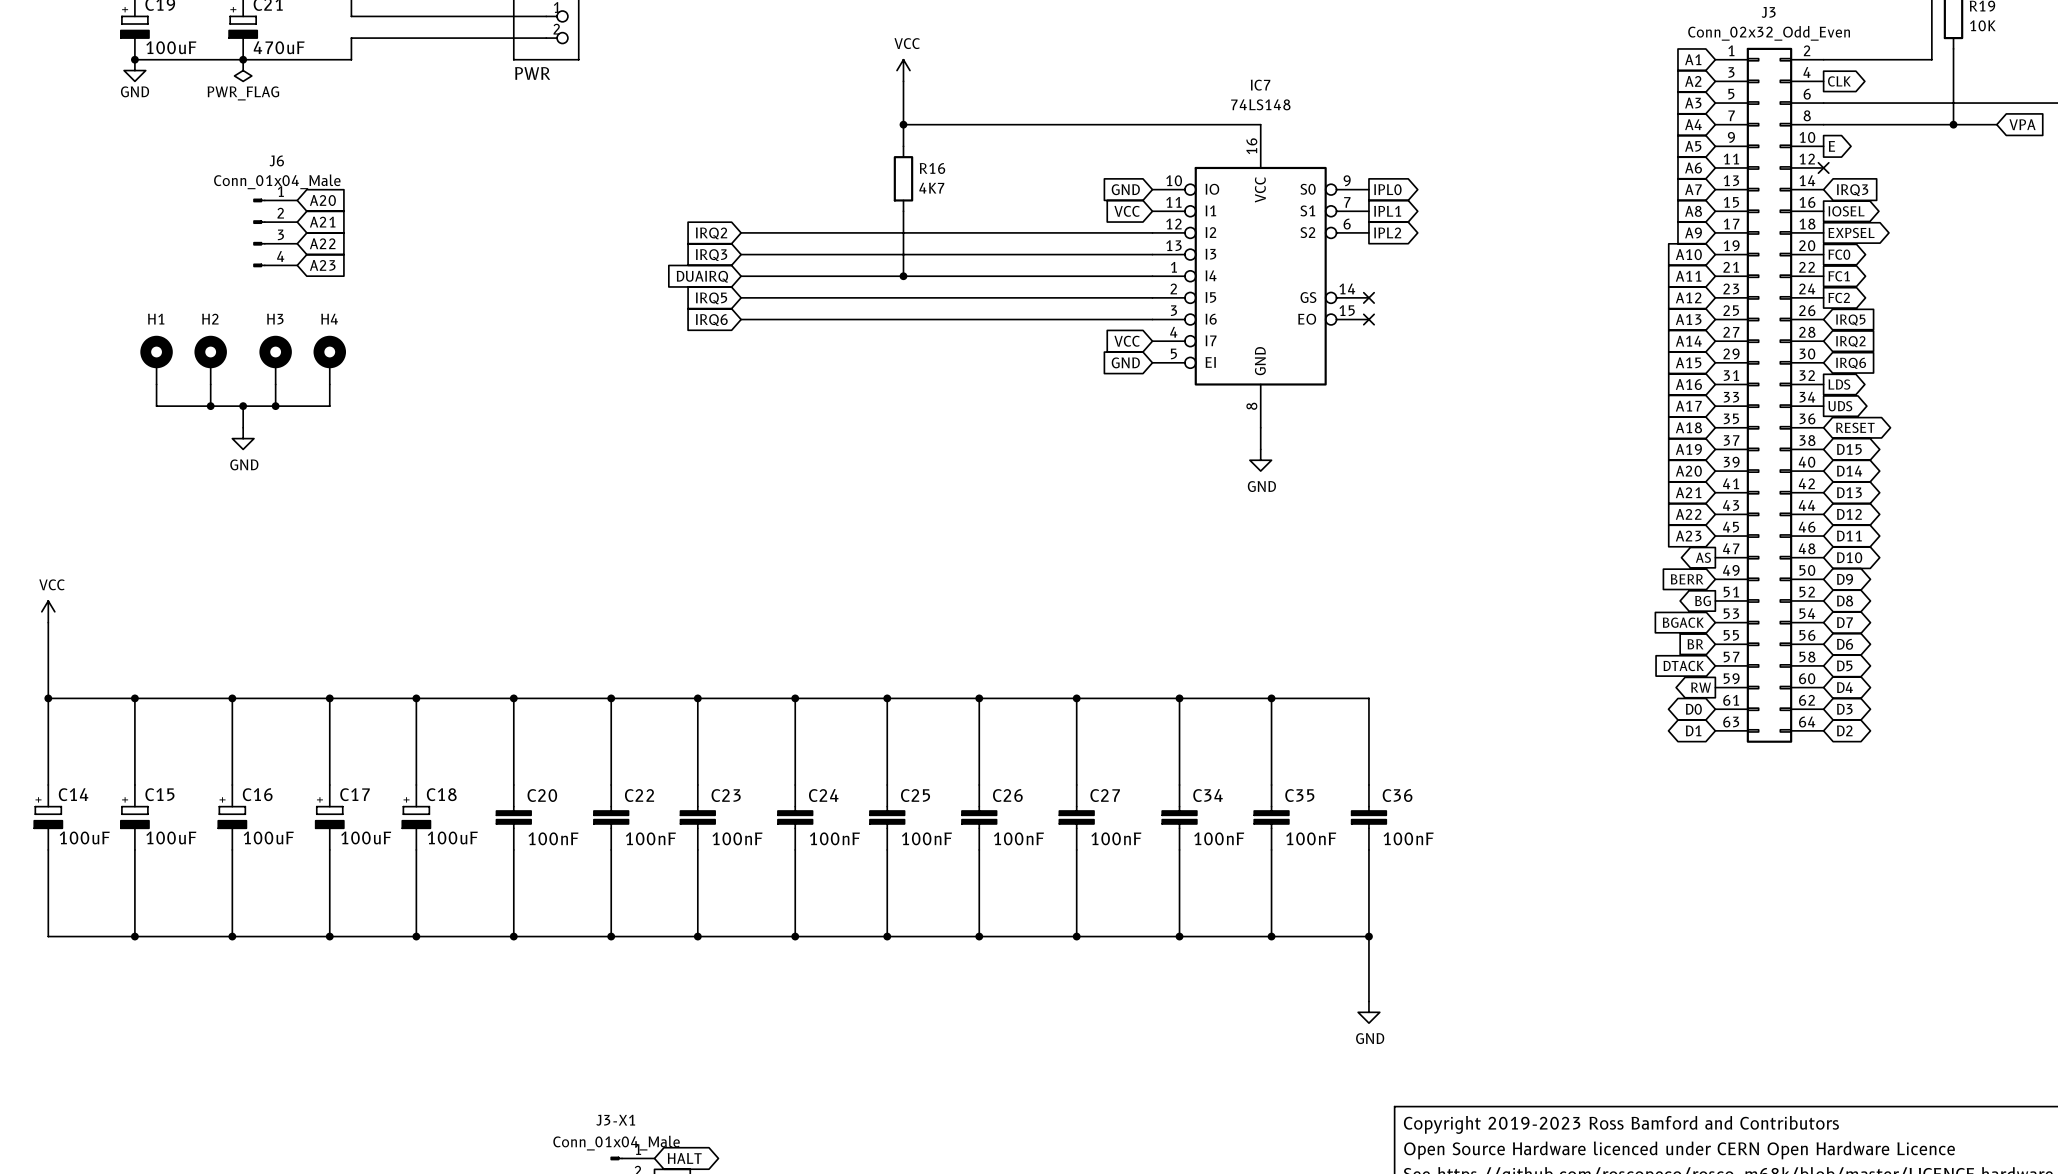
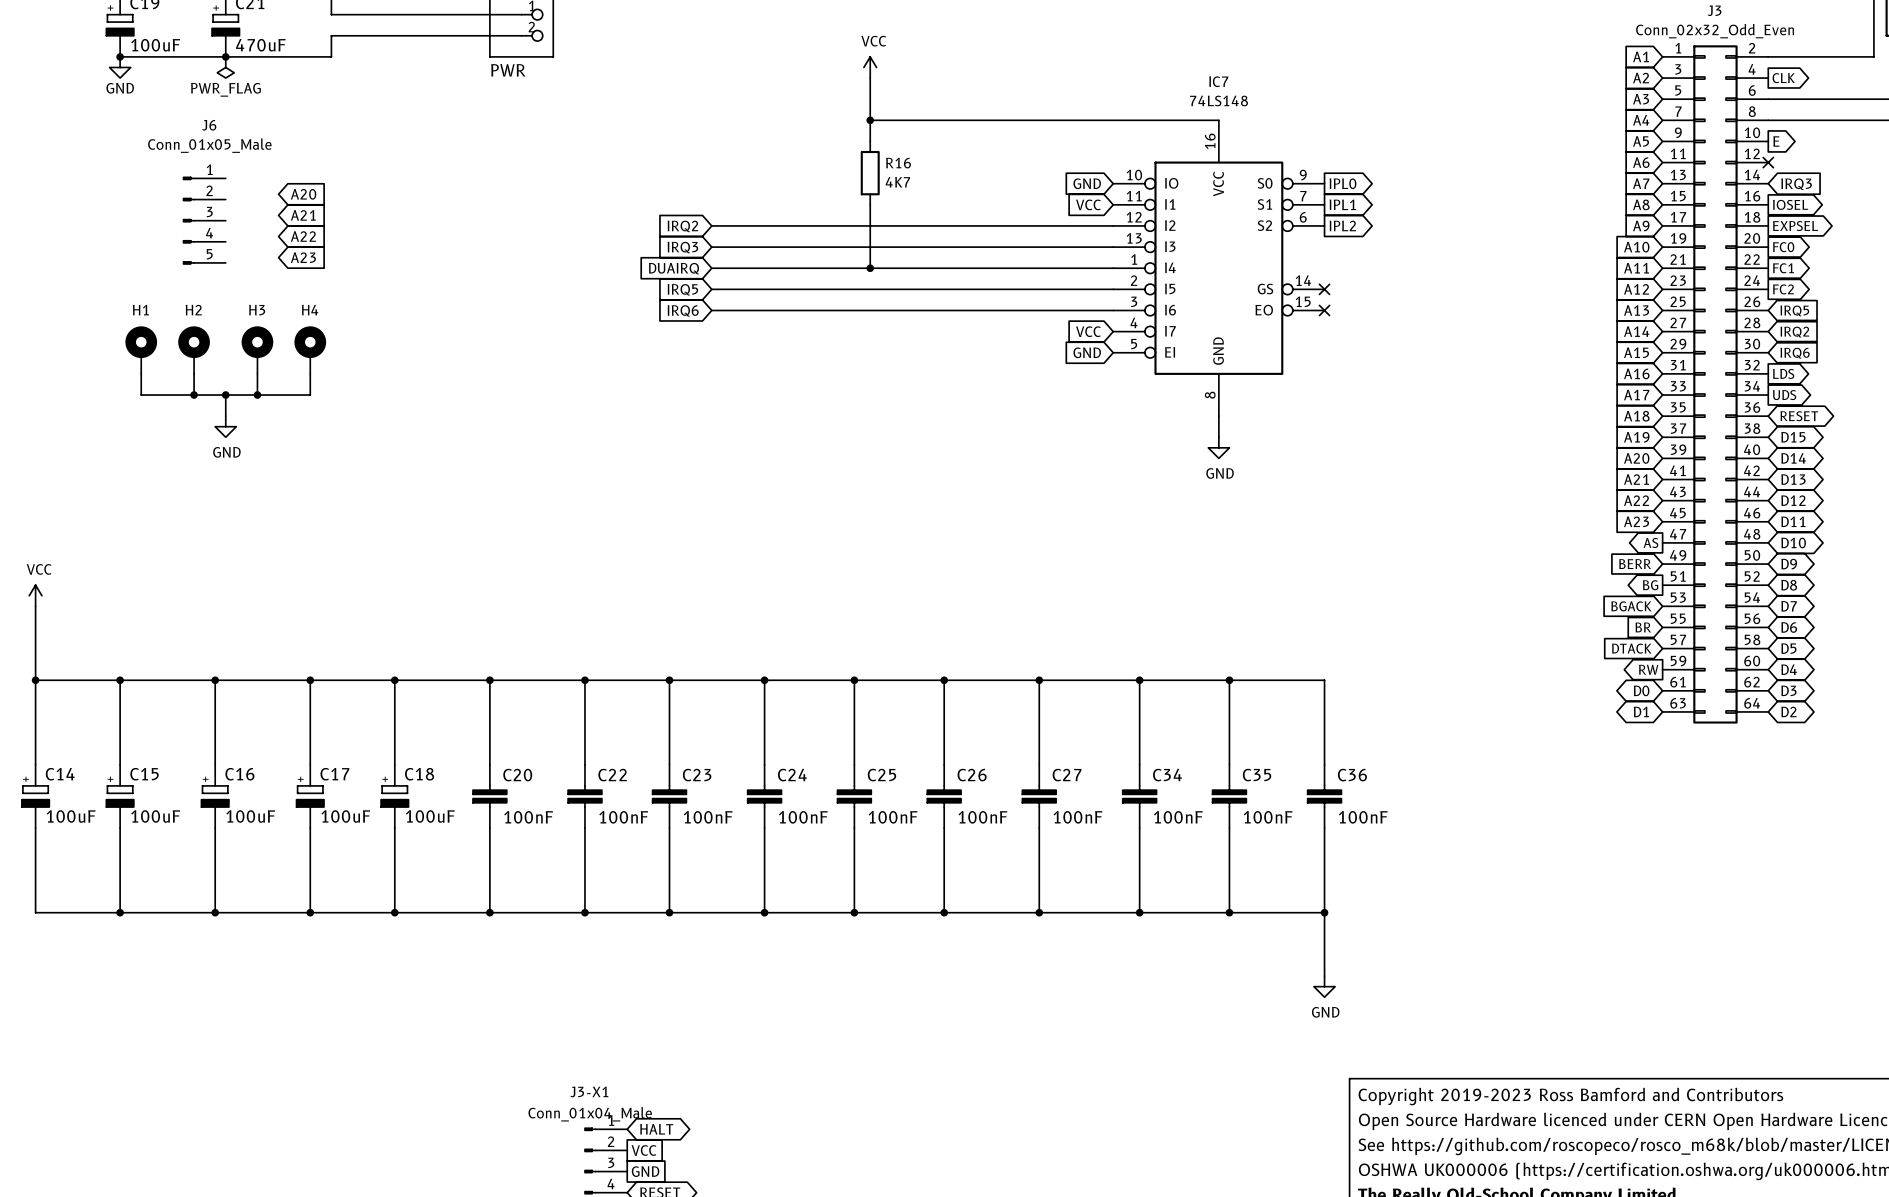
J6 name position: J6 (276, 160) -> J6 (209, 125)
J6 value: Conn_01x04_Male (277, 181) -> Conn_01x05_Male (209, 145)
J6 symbol: [253, 198, 298, 268] -> [182, 176, 226, 265]

